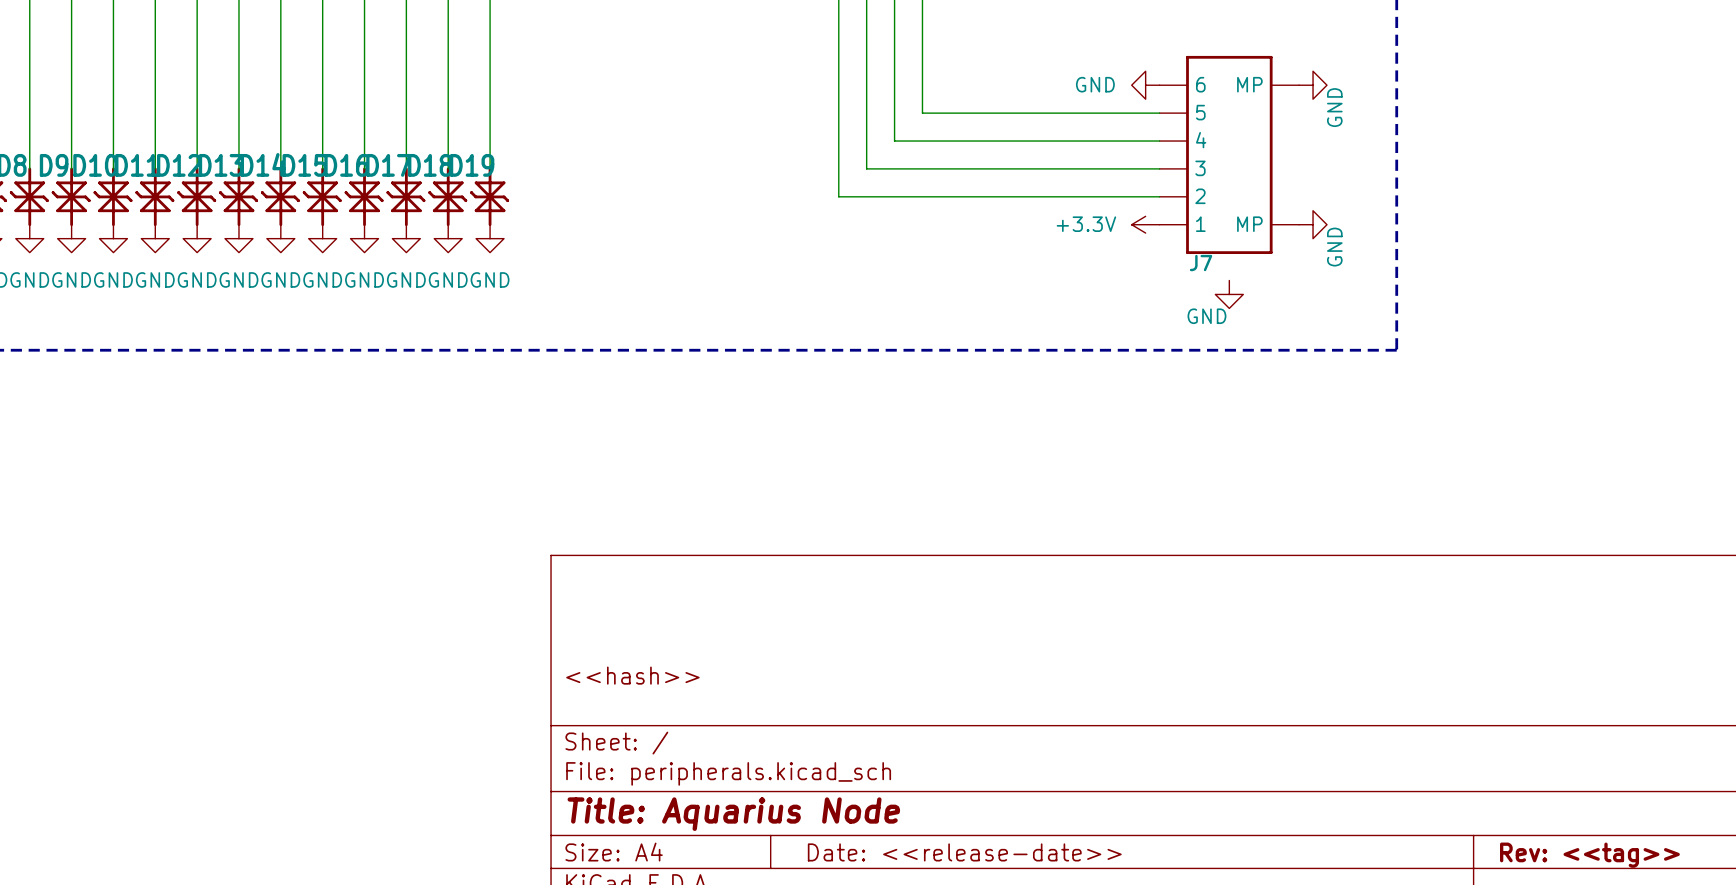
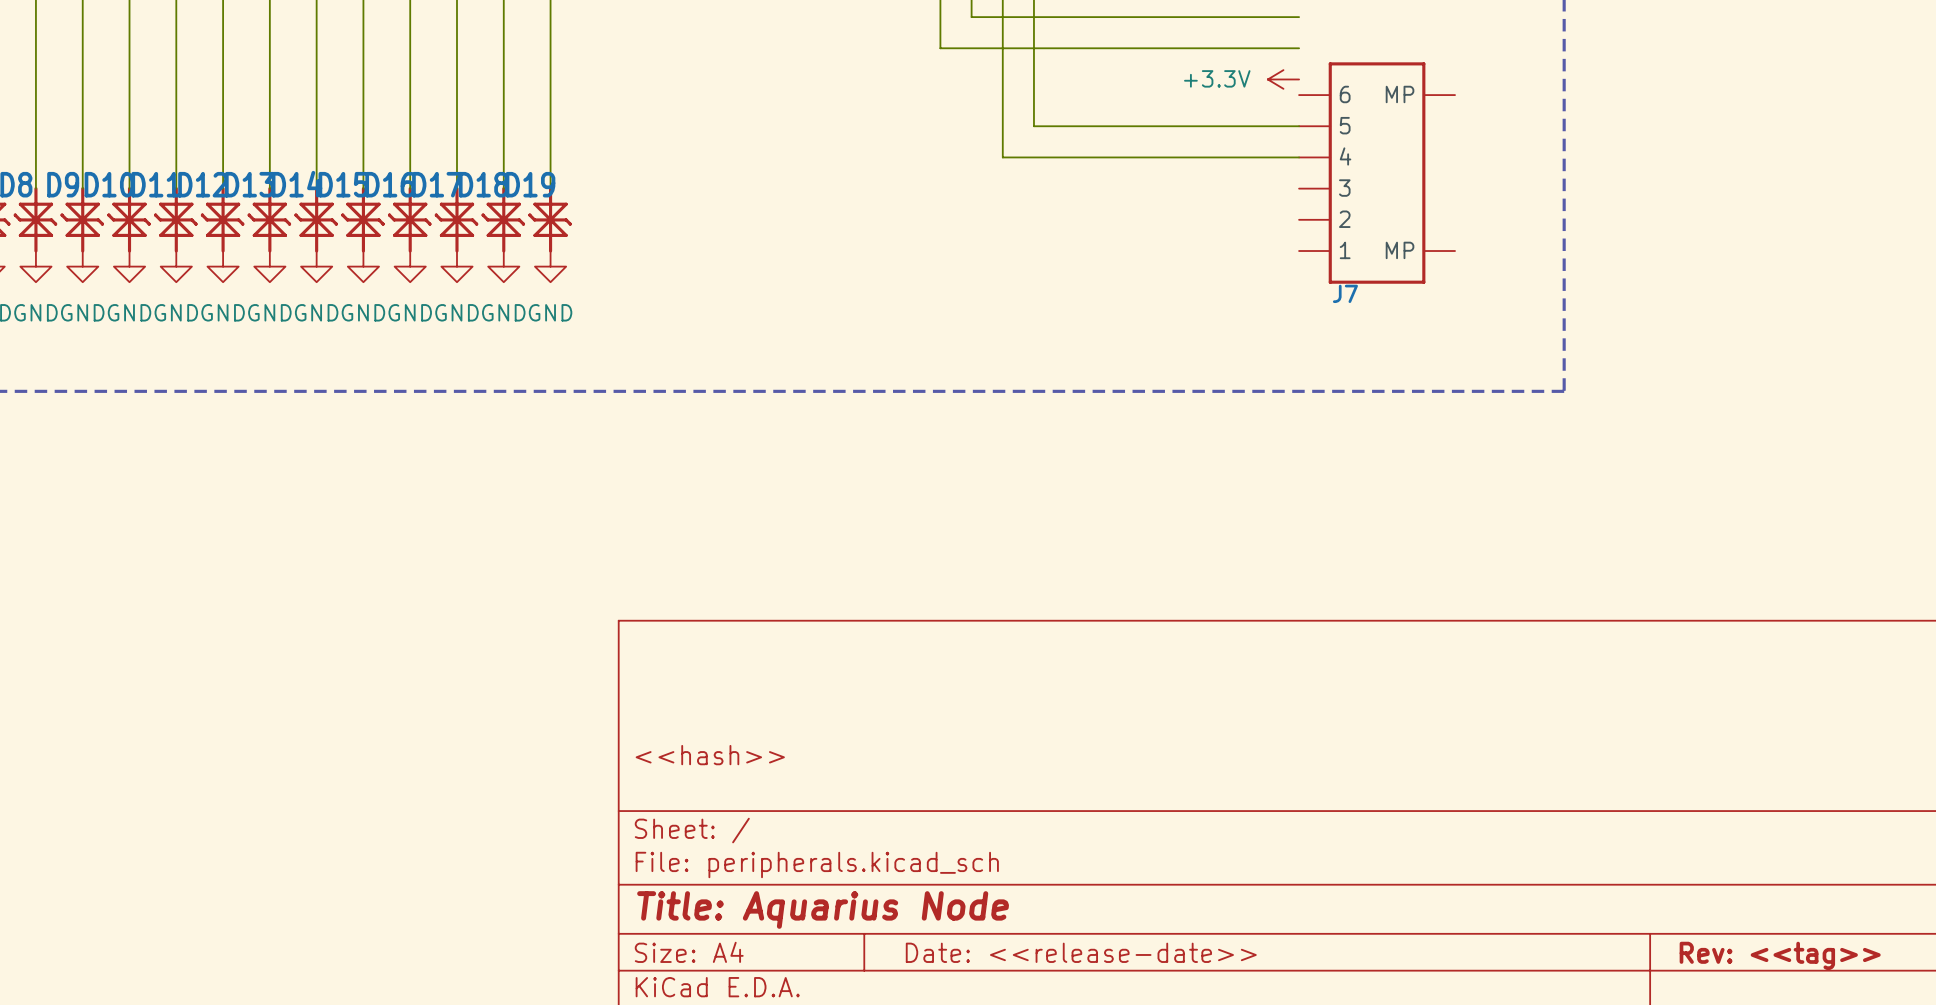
wire: (866, 15) (866, 168) (1159, 168) -> (971, 17) (1299, 17)
wire: (838, 43) (838, 196) (1159, 196) -> (940, 48) (1299, 48)
power symbol: GND (1145, 85) -> none
power symbol: GND (1313, 85) -> none
power symbol position: +3.3V (1145, 224) -> +3.3V (1283, 79)
power symbol: GND (1313, 224) -> none
power symbol: GND (1229, 294) -> none

